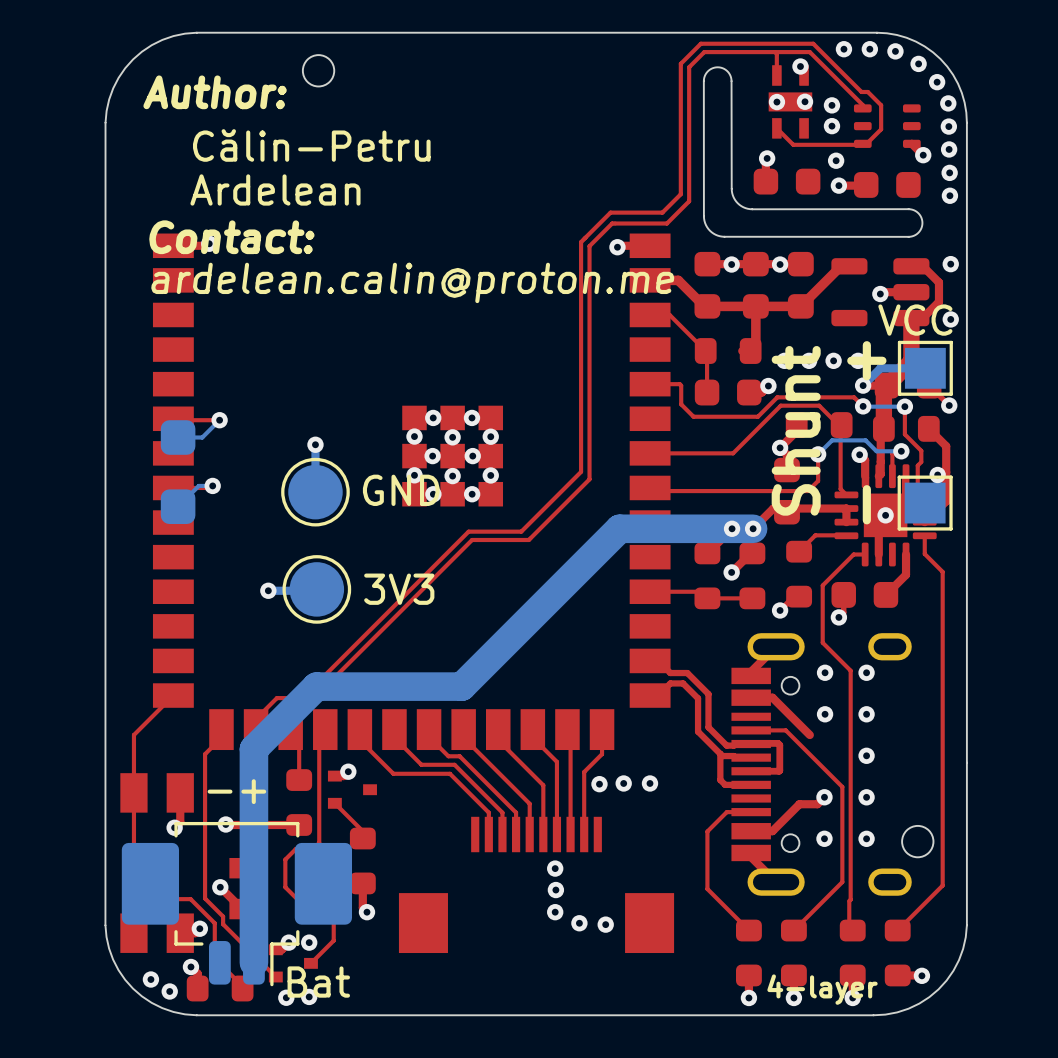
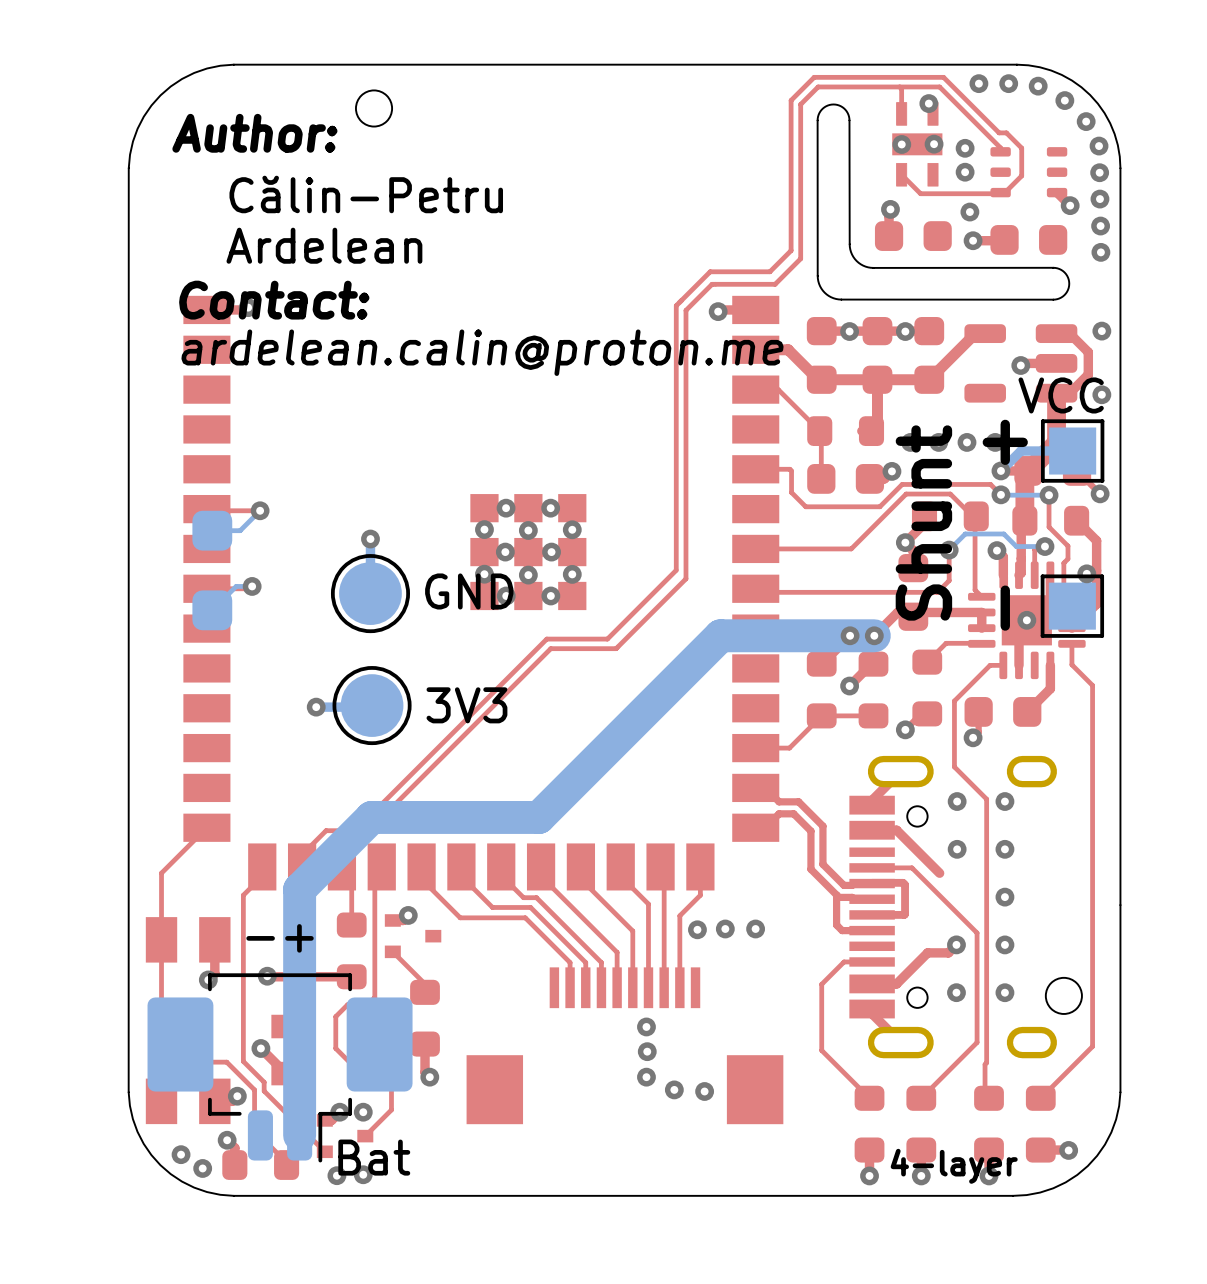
top track: (650, 591) (700, 591) (707, 598) -> (755, 748) (789, 748) (821, 715)

